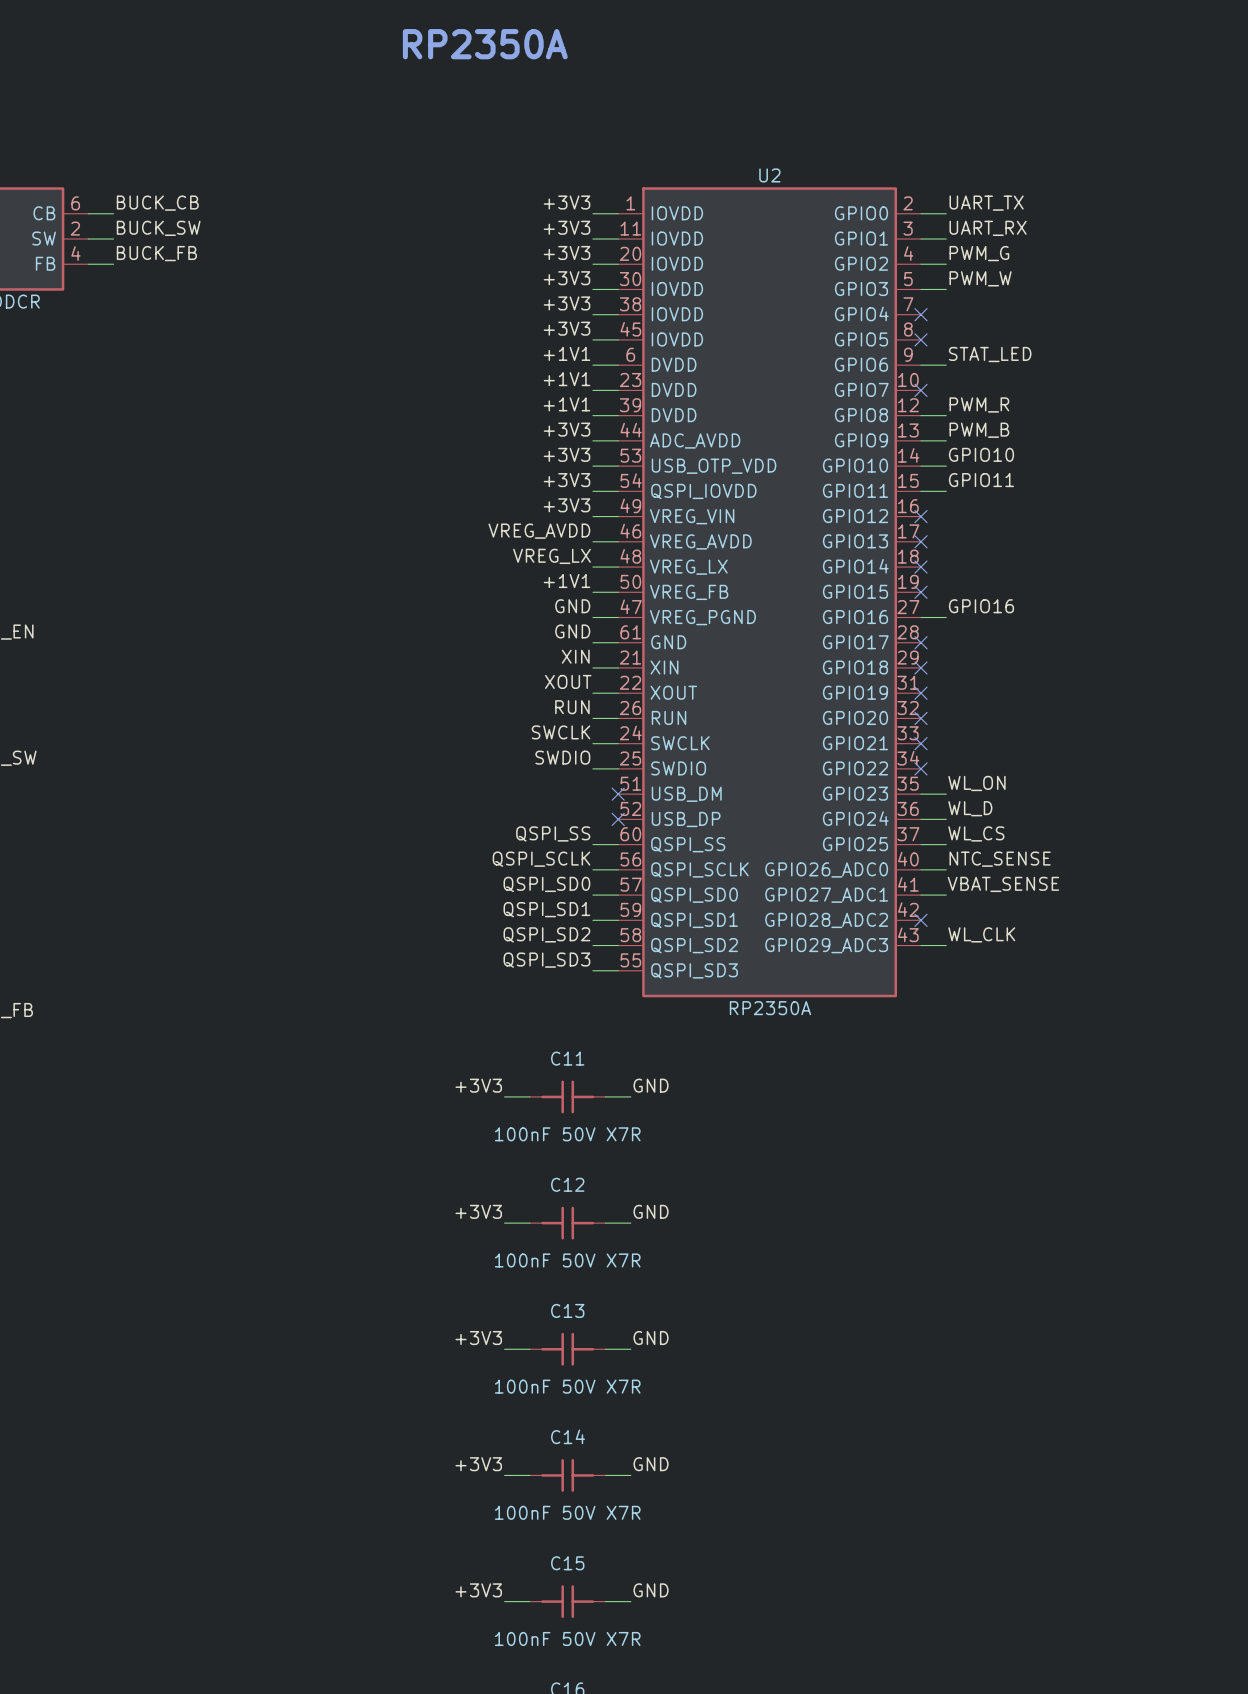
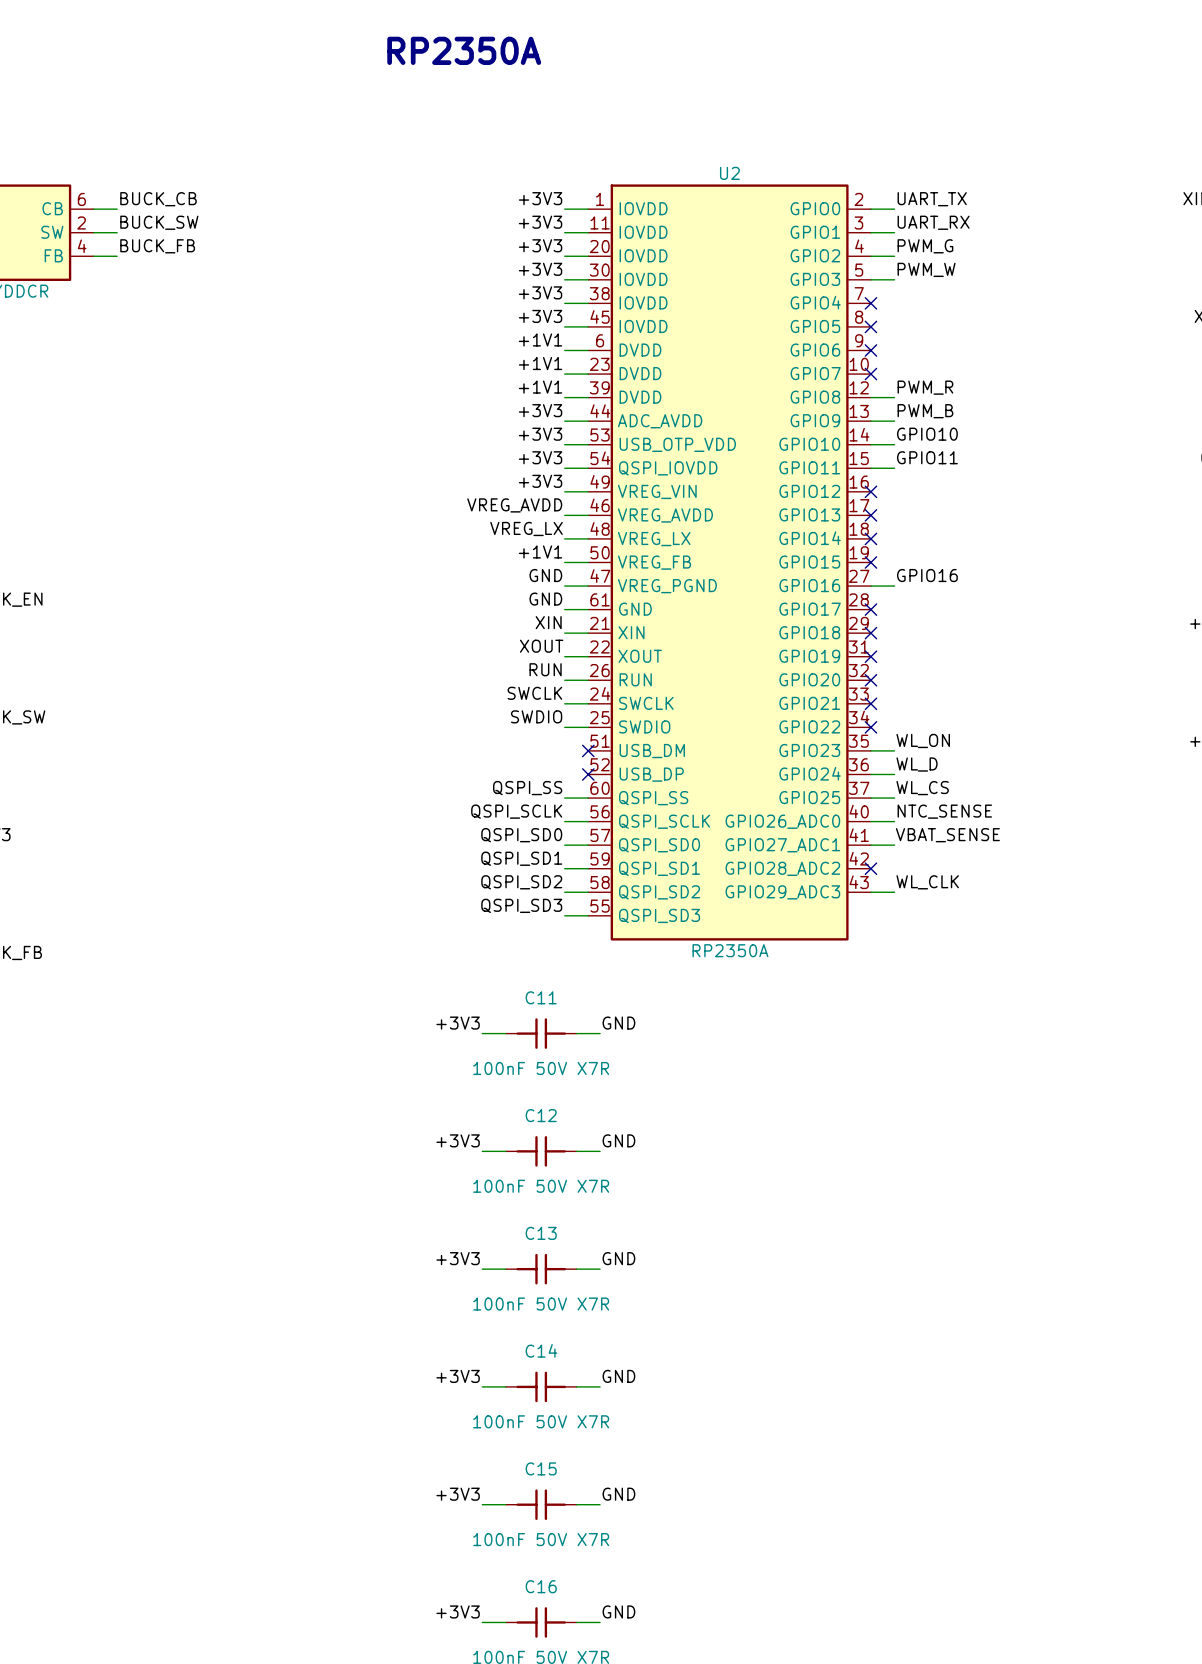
label: STAT_LED (990, 354) -> none
wire: (920, 365) (946, 365) -> none
no-connect mark: none -> (870, 350)

